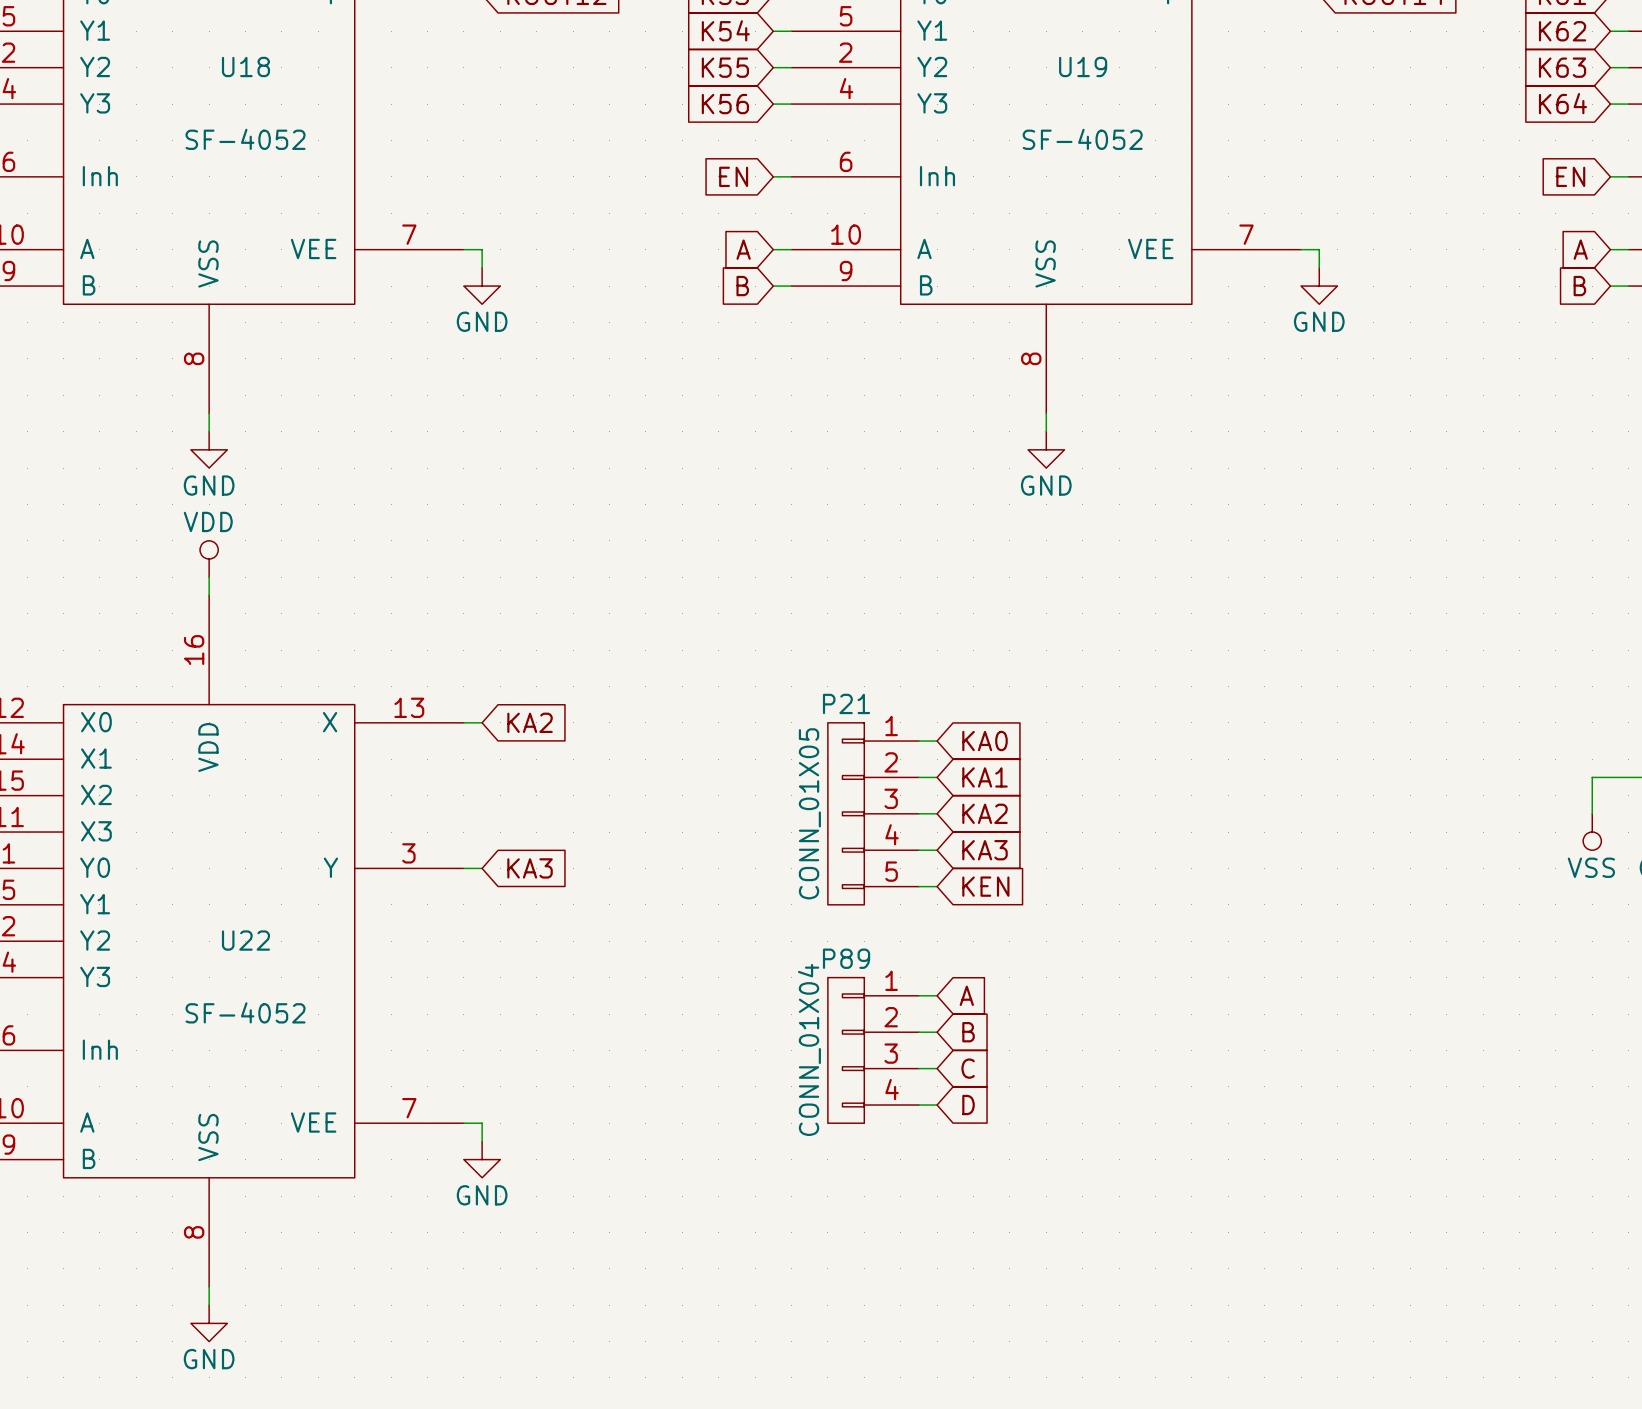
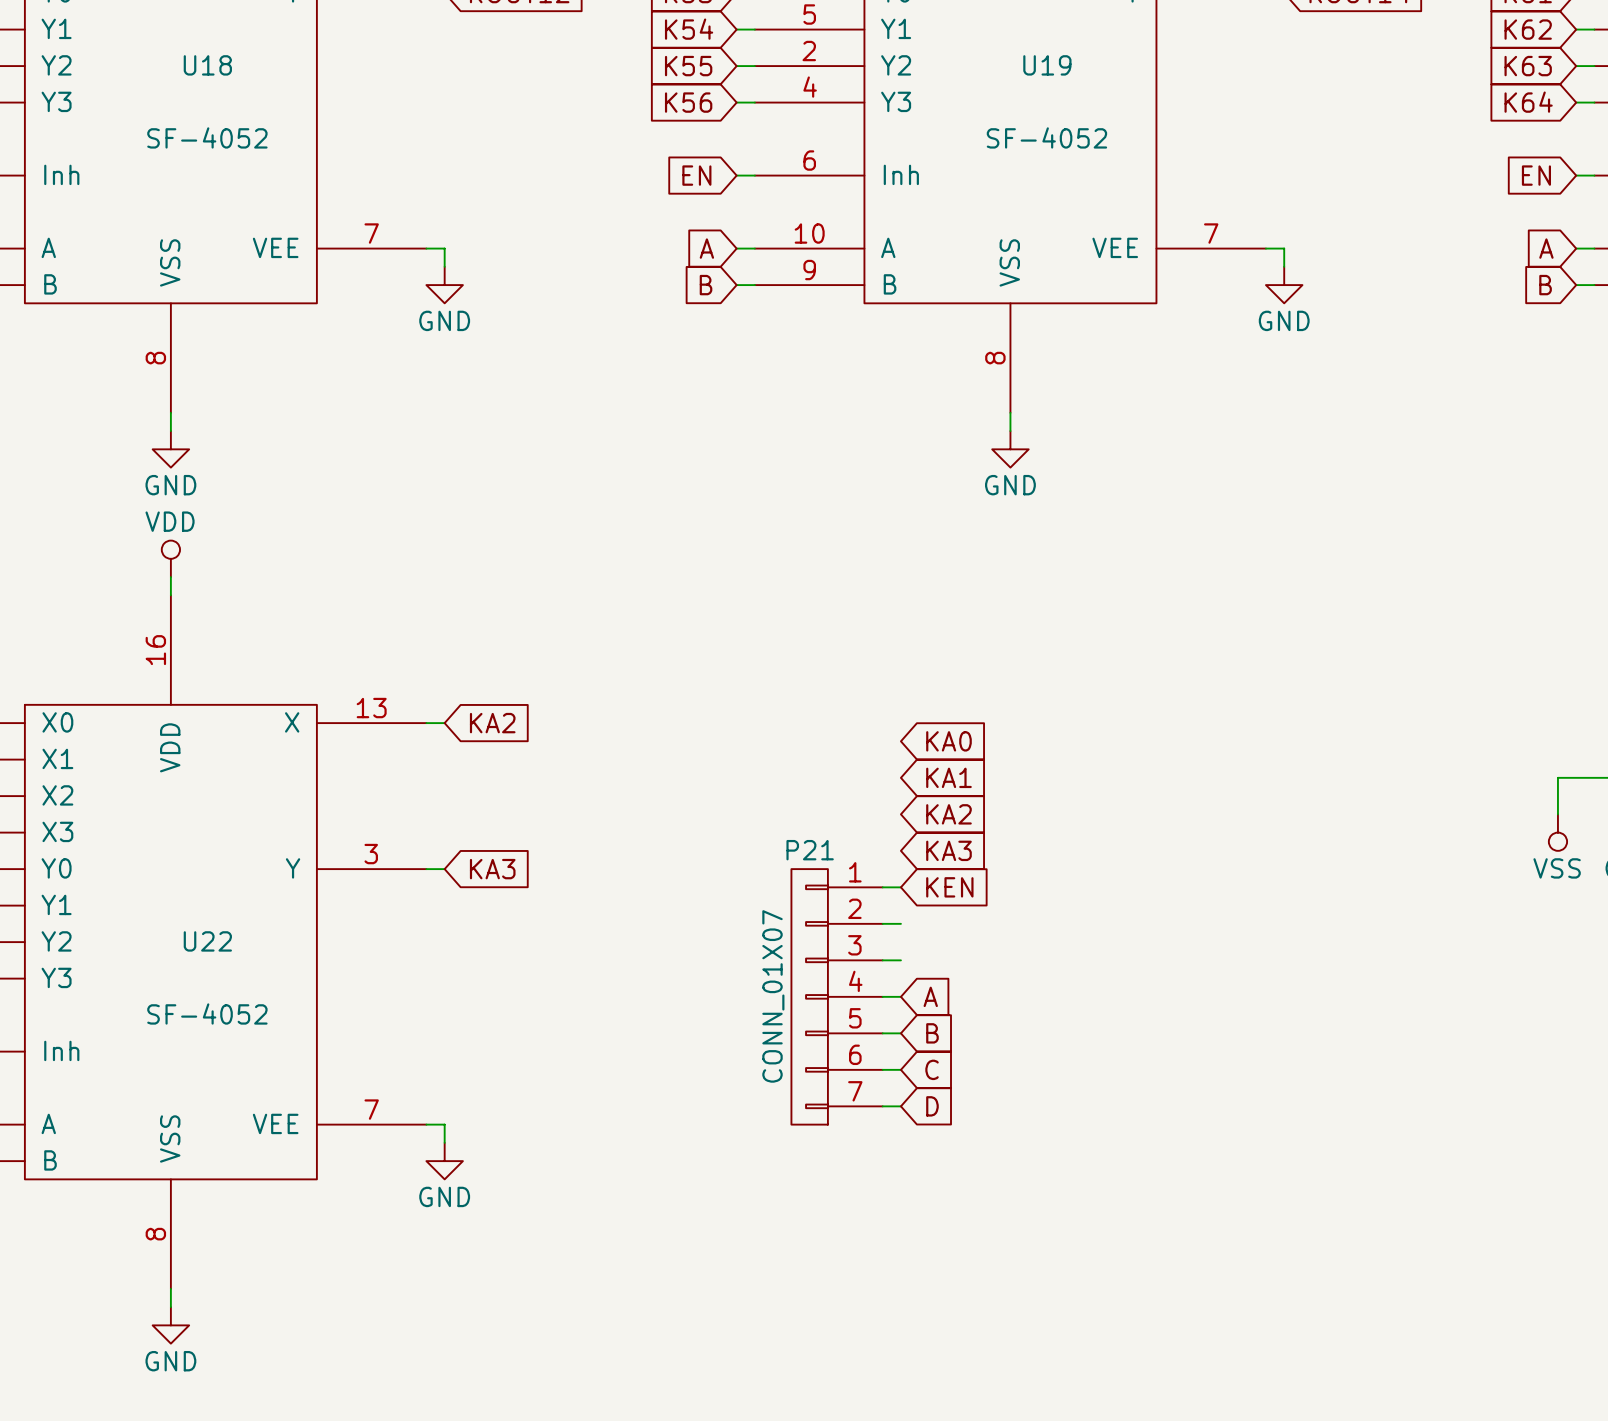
P21 name position: P21 (846, 703) -> P21 (810, 850)
P21 symbol: [827, 722, 919, 905] -> [791, 869, 883, 1125]
wire: (918, 741) (937, 741) -> none
wire: (918, 777) (937, 777) -> none
P21 value: CONN_01X05 (809, 813) -> CONN_01X07 (773, 996)
wire: (918, 813) (937, 813) -> (882, 923) (900, 923)
wire: (918, 850) (937, 850) -> (882, 960) (900, 960)
P89: CONN_01X04 (873, 1050) -> none

